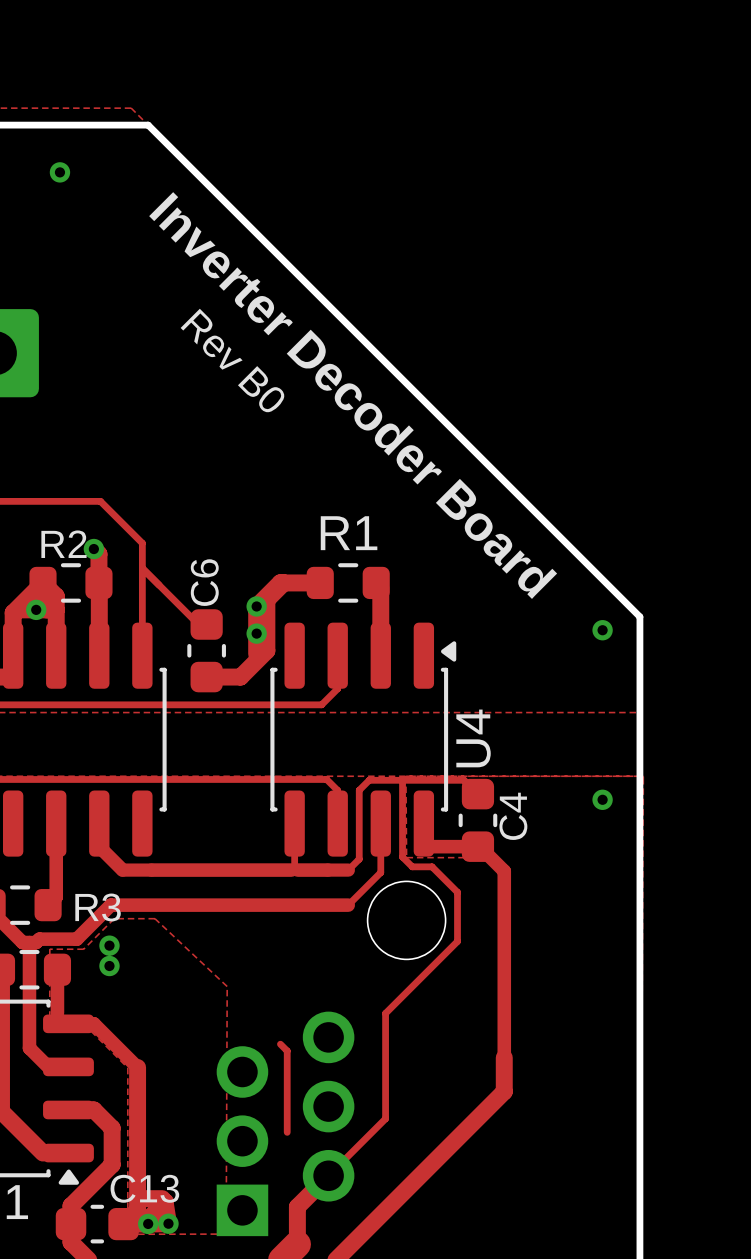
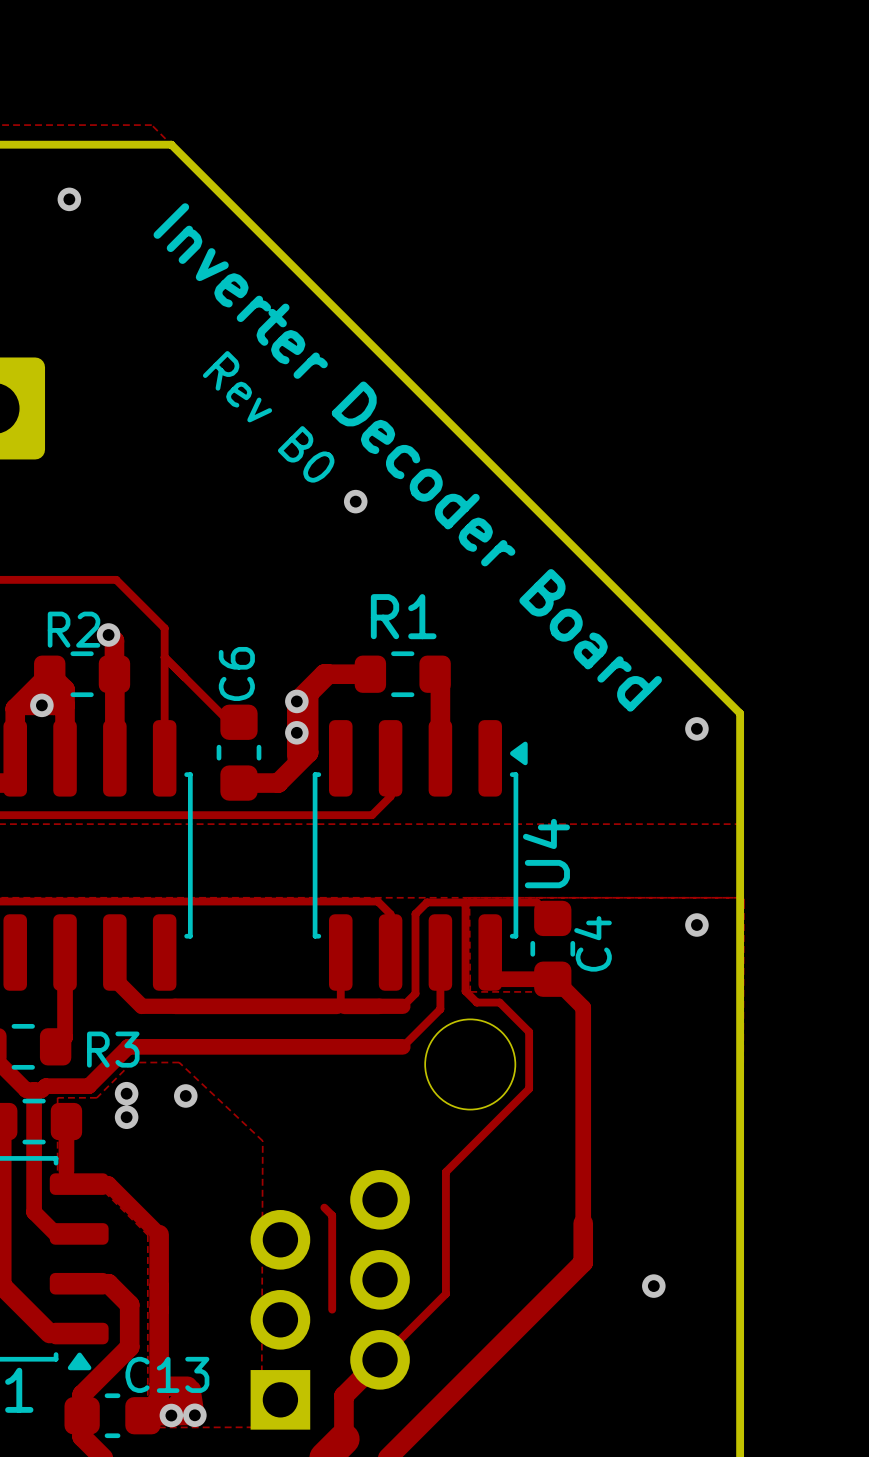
via: none -> (355, 501)
via: none -> (185, 1095)
via: none -> (653, 1286)

